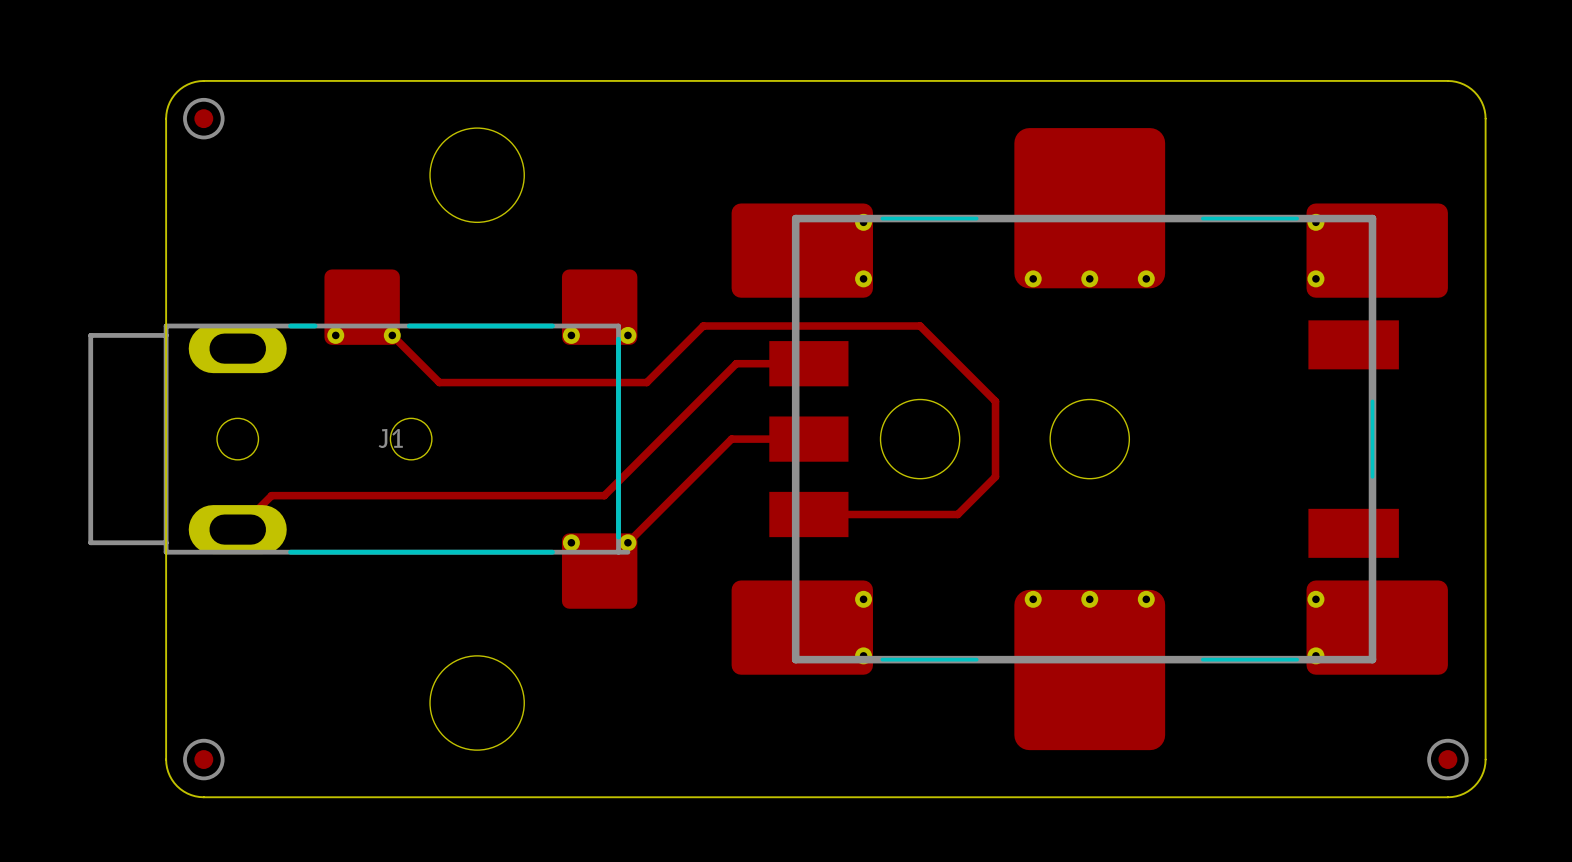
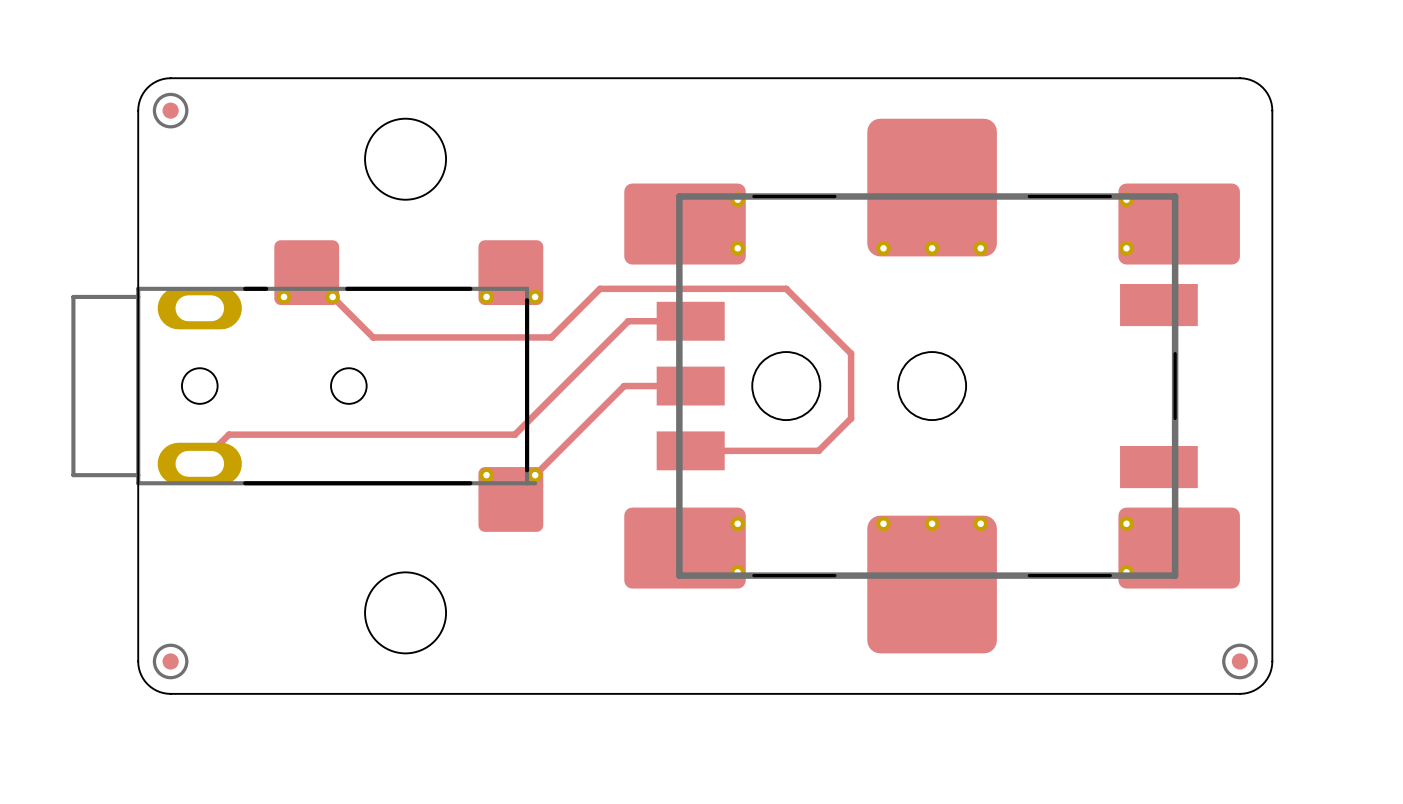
J1 name: J1 (390, 438) -> none

